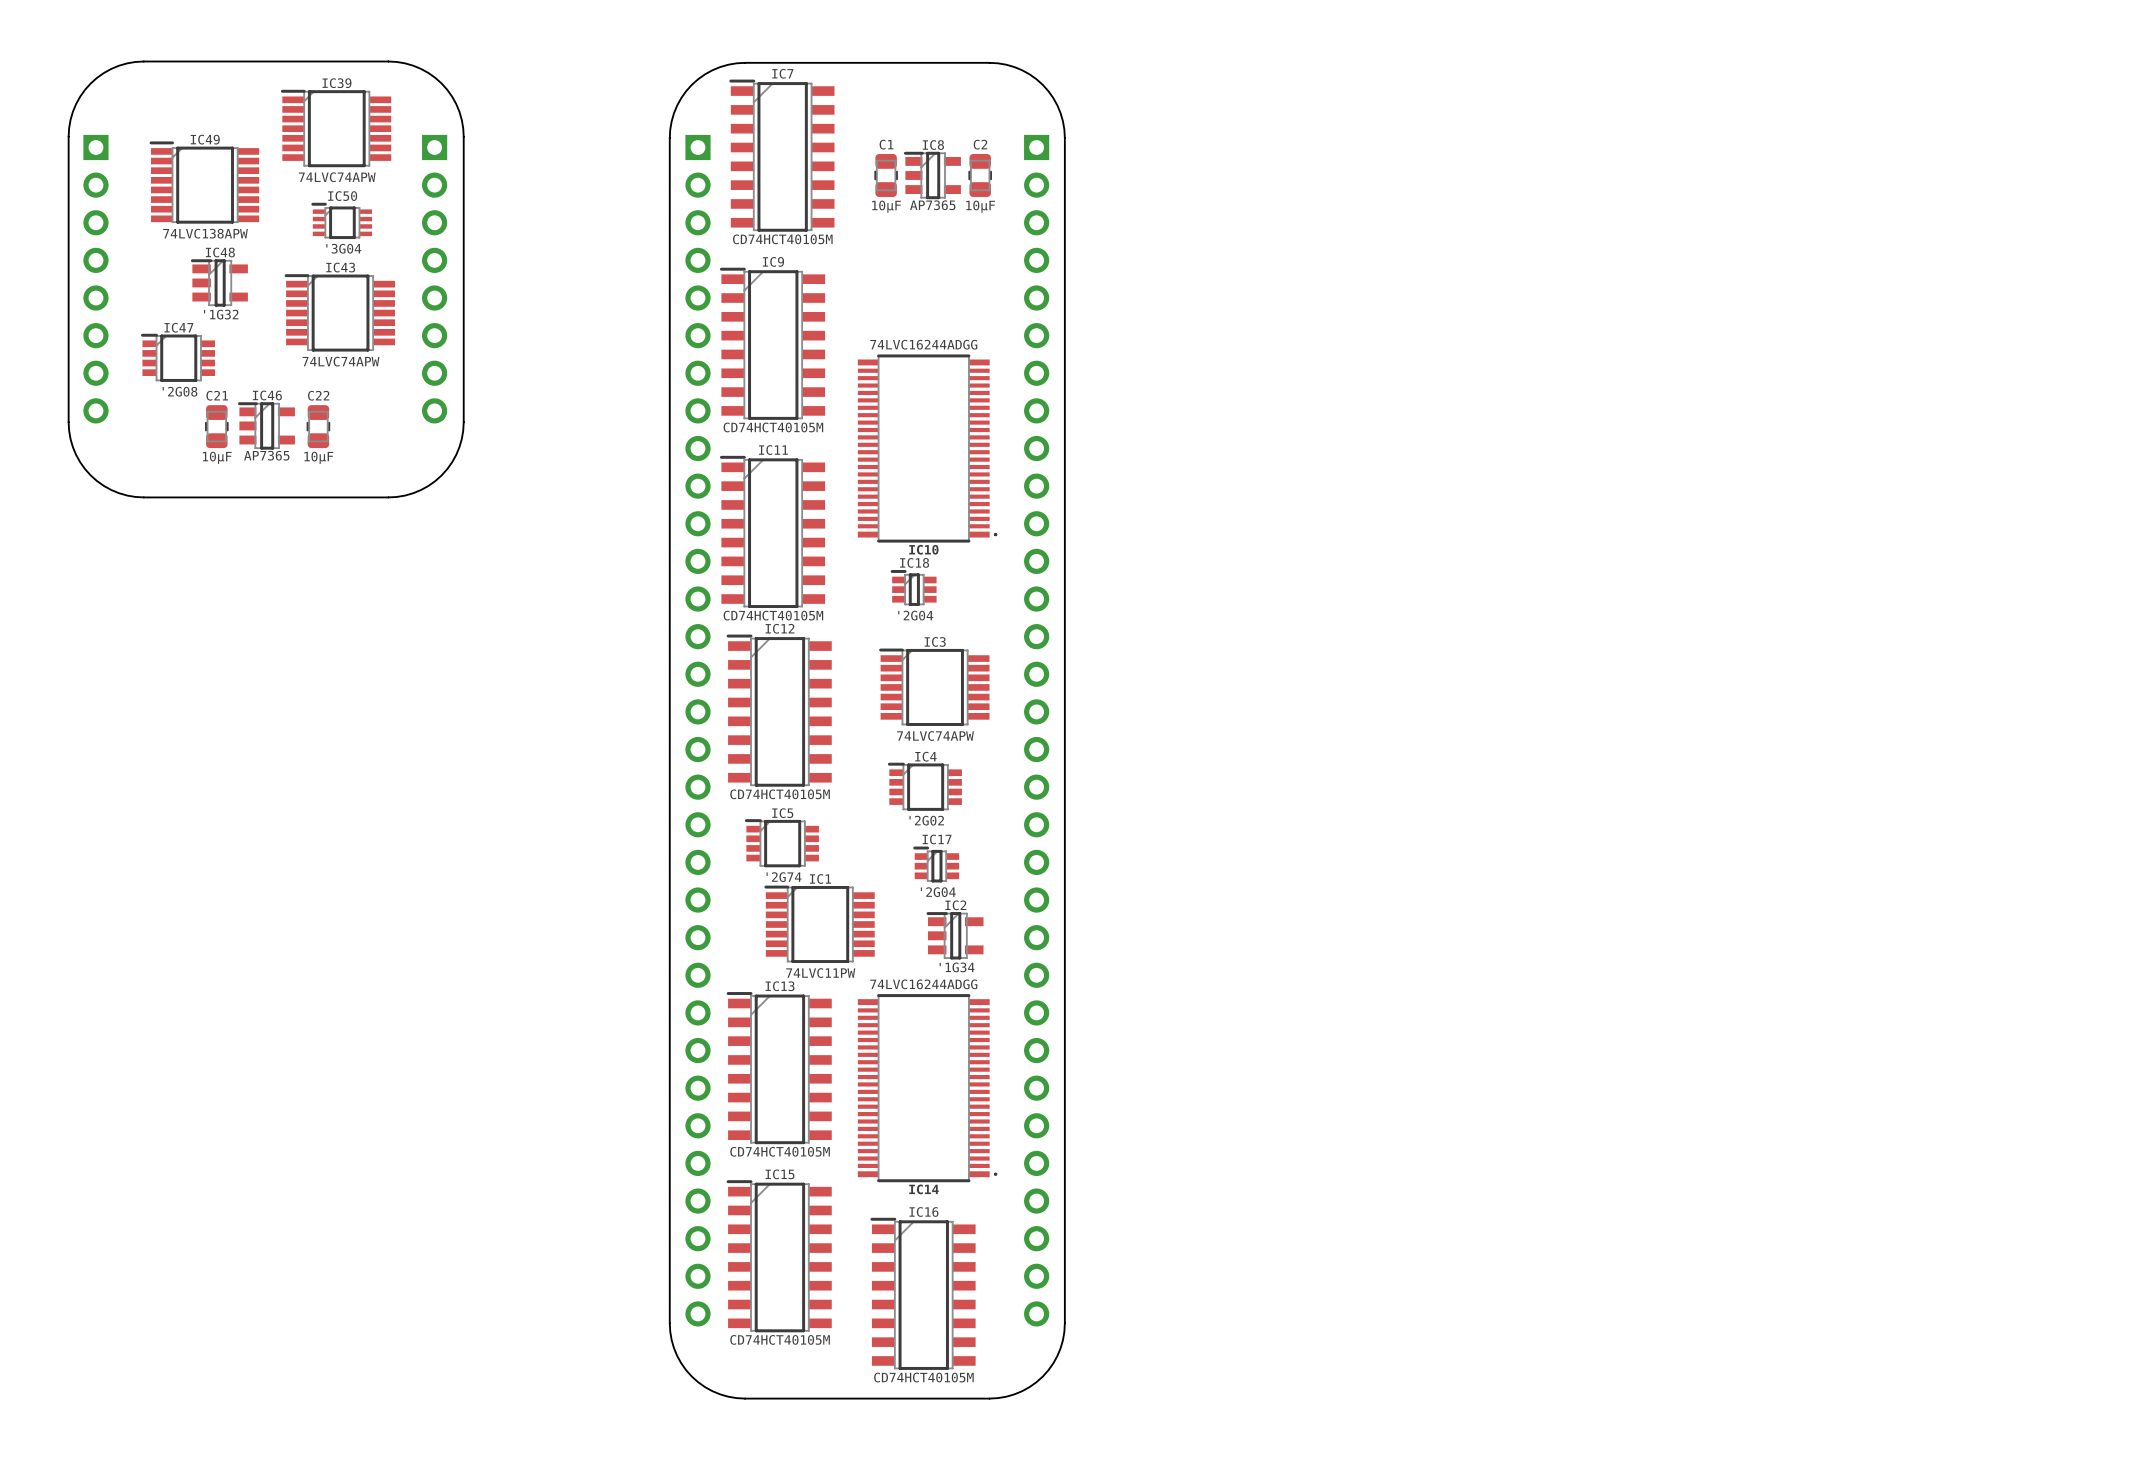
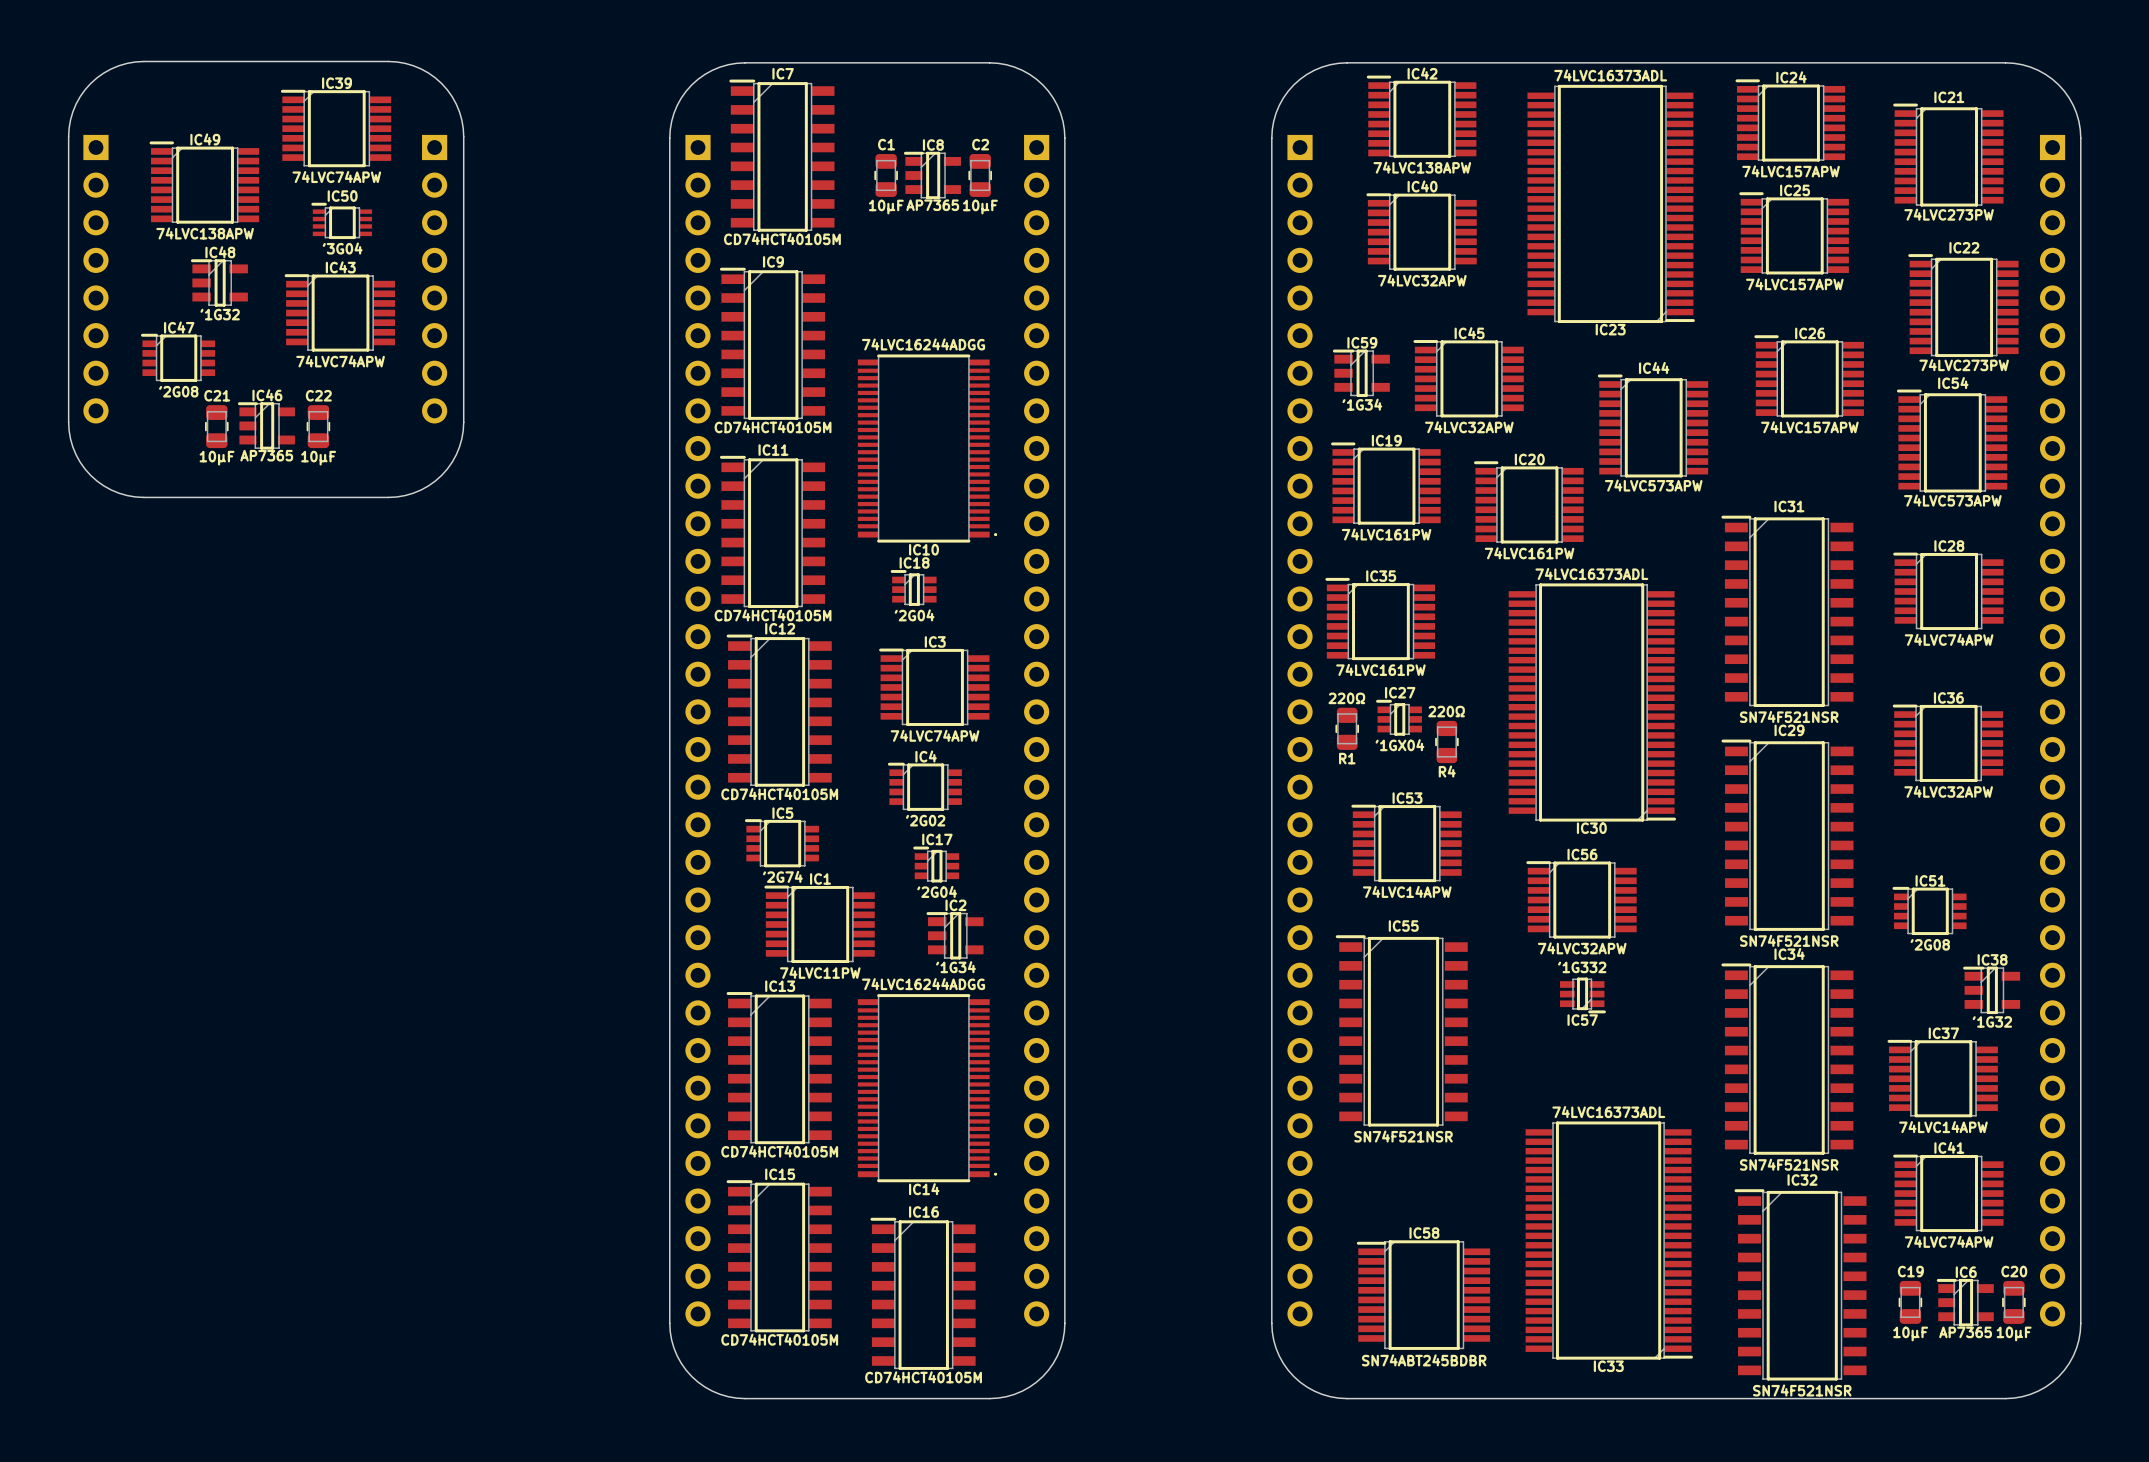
board edge: none -> (1347, 62) (2013, 63) (2038, 70) (2052, 79) (2064, 91) (2073, 105) (2078, 121) (2080, 138) (2080, 1323) (2076, 1348) (2069, 1363) (2052, 1382) (2038, 1391) (2022, 1396) (2005, 1398) (1347, 1398) (1322, 1394) (1307, 1387) (1293, 1376) (1279, 1355) (1273, 1340) (1271, 1323) (1271, 138) (1273, 121) (1279, 105) (1293, 84) (1314, 70) (1330, 64) (1347, 62)
IC42: none -> (1421, 116)
IC24: none -> (1790, 120)
IC21: none -> (1948, 155)
IC23: none -> (1611, 203)
IC40: none -> (1421, 231)
IC25: none -> (1794, 233)
IC22: none -> (1963, 305)
IC59: none -> (1361, 373)
IC26: none -> (1809, 376)
IC45: none -> (1468, 378)
IC44: none -> (1652, 425)
IC54: none -> (1952, 441)
IC19: none -> (1385, 483)
IC20: none -> (1528, 502)
IC28: none -> (1948, 591)
IC31: none -> SN74F521NSR (1787, 611)
IC35: none -> (1380, 619)
IC30: none -> (1592, 702)
IC27: none -> (1398, 717)
R1: none -> 220Ω (1347, 728)
part: none -> (1300, 730)
part: none -> (2052, 730)
R4: none -> 220Ω (1446, 742)
IC36: none -> (1947, 743)
IC29: none -> SN74F521NSR (1787, 835)
IC53: none -> (1406, 843)
IC56: none -> (1581, 899)
IC51: none -> (1929, 910)
IC38: none -> (1991, 990)
IC57: none -> (1582, 995)
IC55: none -> SN74F521NSR (1401, 1030)
IC34: none -> SN74F521NSR (1787, 1059)
IC37: none -> (1942, 1078)
IC41: none -> (1948, 1193)
IC33: none -> (1609, 1240)
IC32: none -> SN74F521NSR (1800, 1284)
IC58: none -> SN74ABT245BDBR (1423, 1295)
C19: none -> 10µF (1910, 1302)
IC6: none -> (1965, 1302)
C20: none -> 10µF (2013, 1302)

